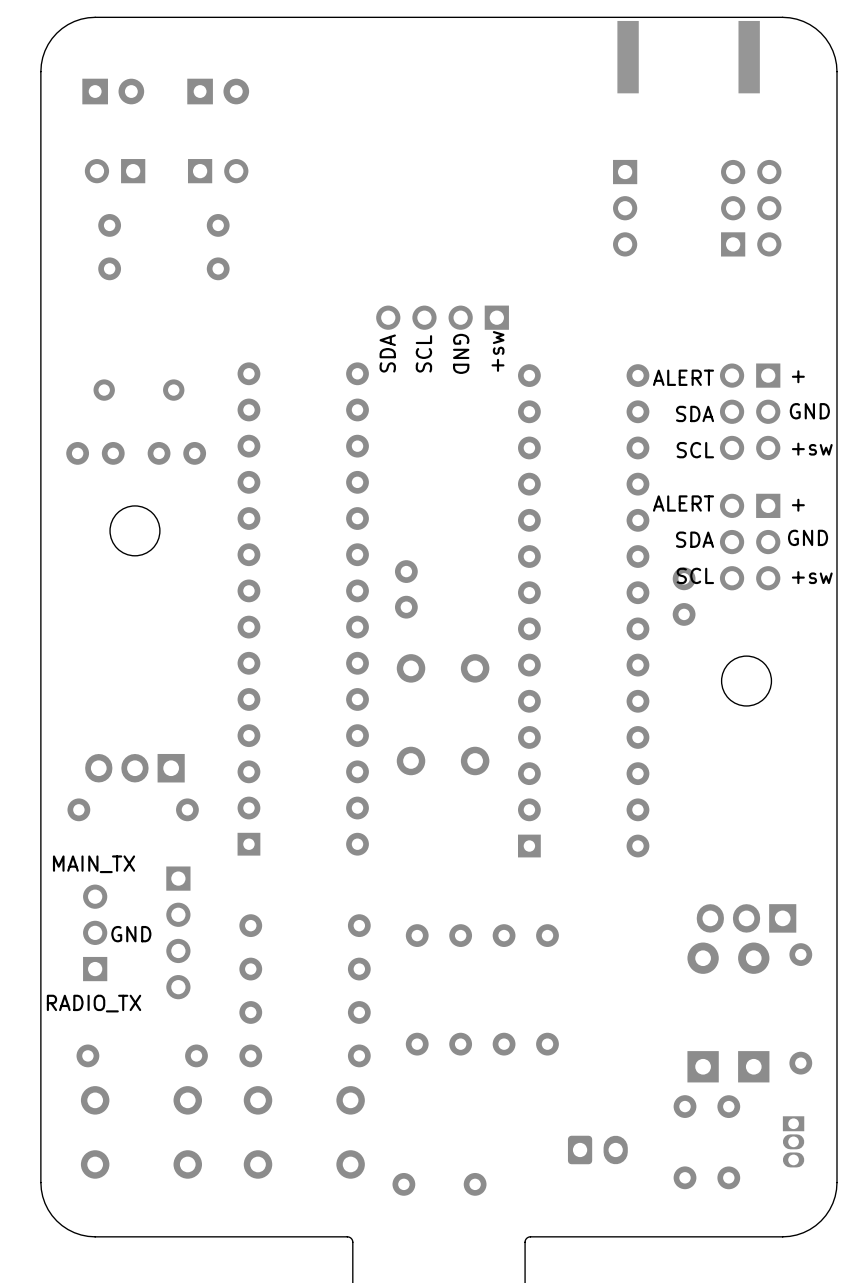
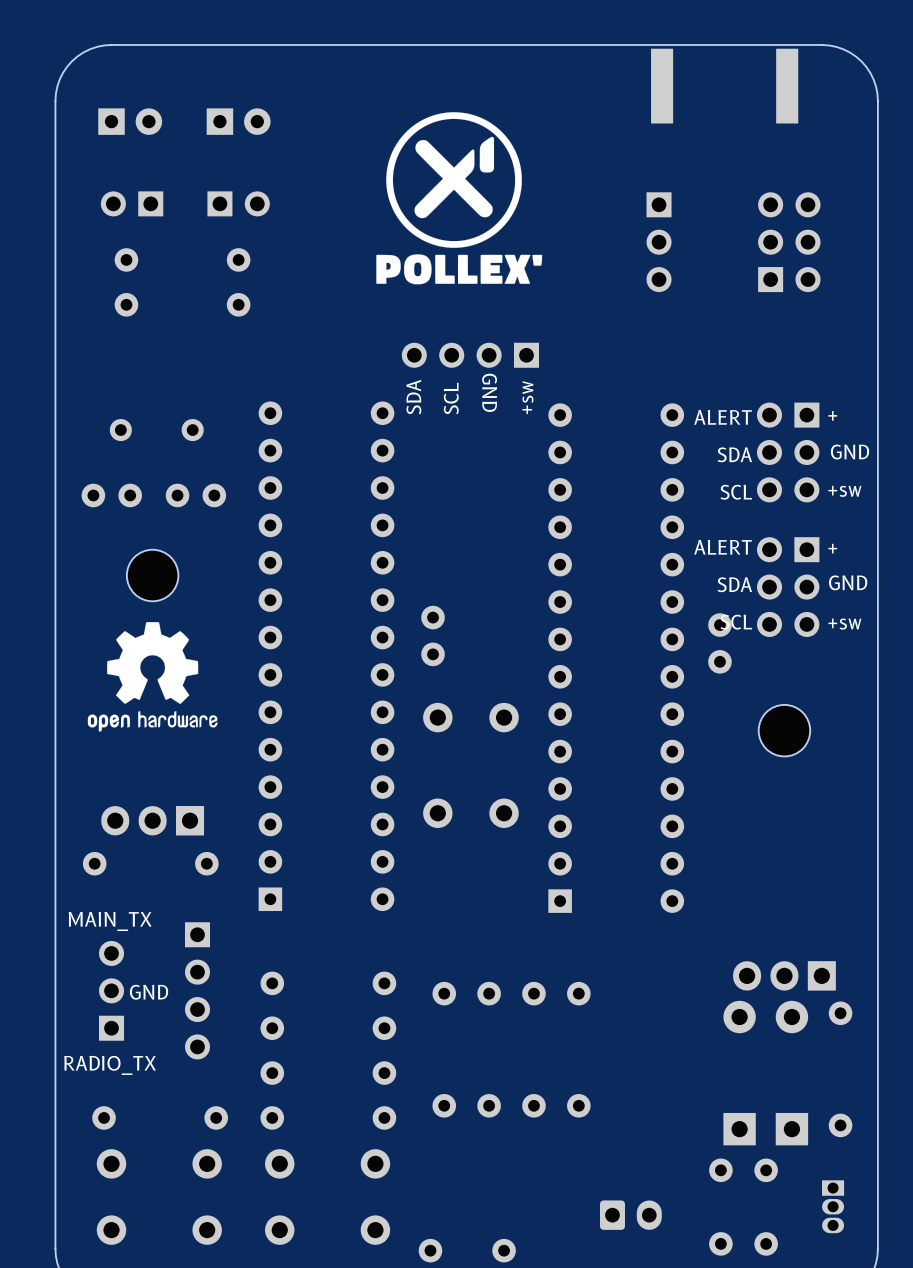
drawing: none -> [376, 112, 543, 285]
drawing: none -> [87, 622, 218, 732]

